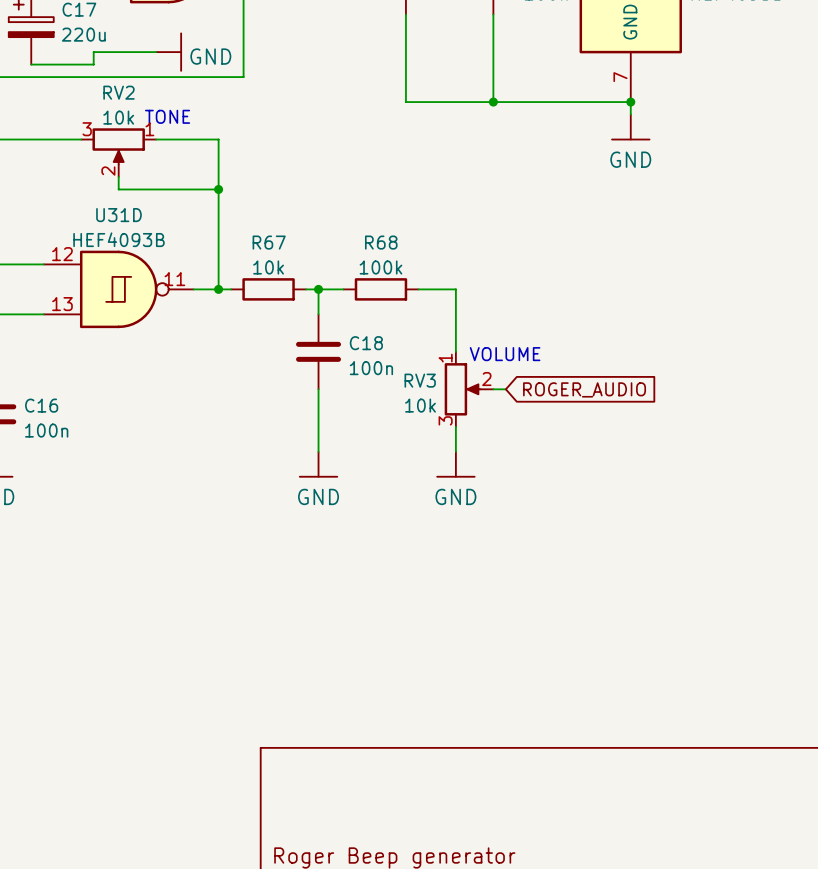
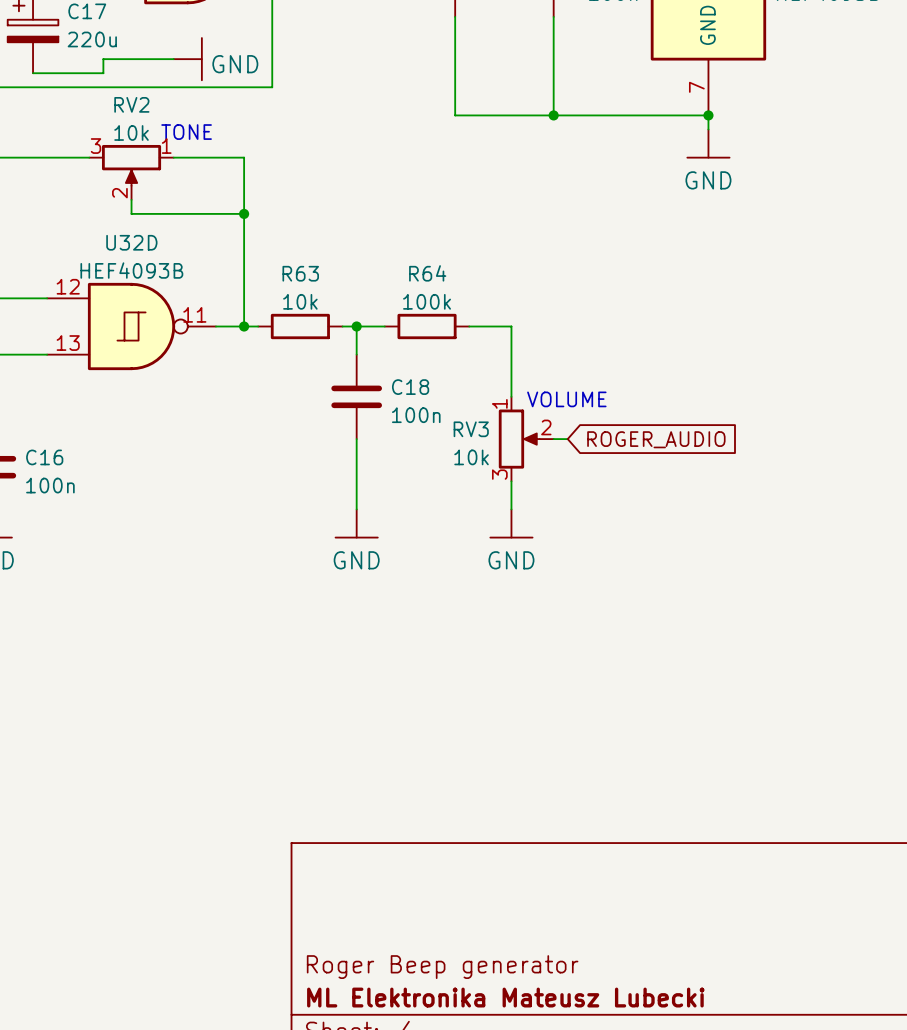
U31D name: U31D (118, 215) -> U32D (131, 242)
R67 name: R67 (269, 242) -> R63 (300, 273)
R68 name: R68 (381, 242) -> R64 (427, 273)

